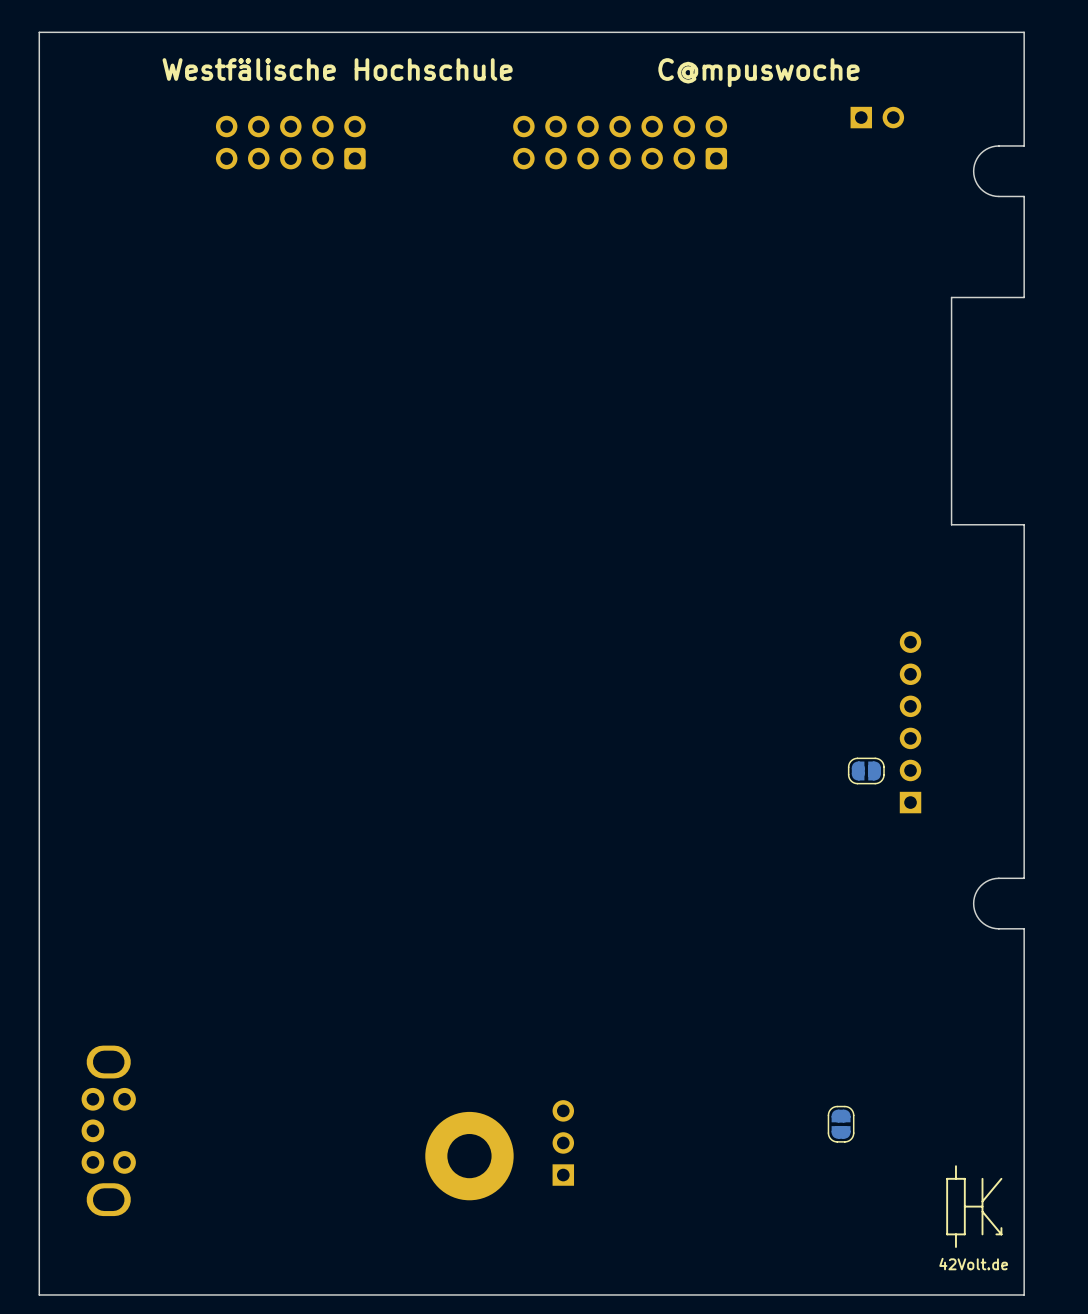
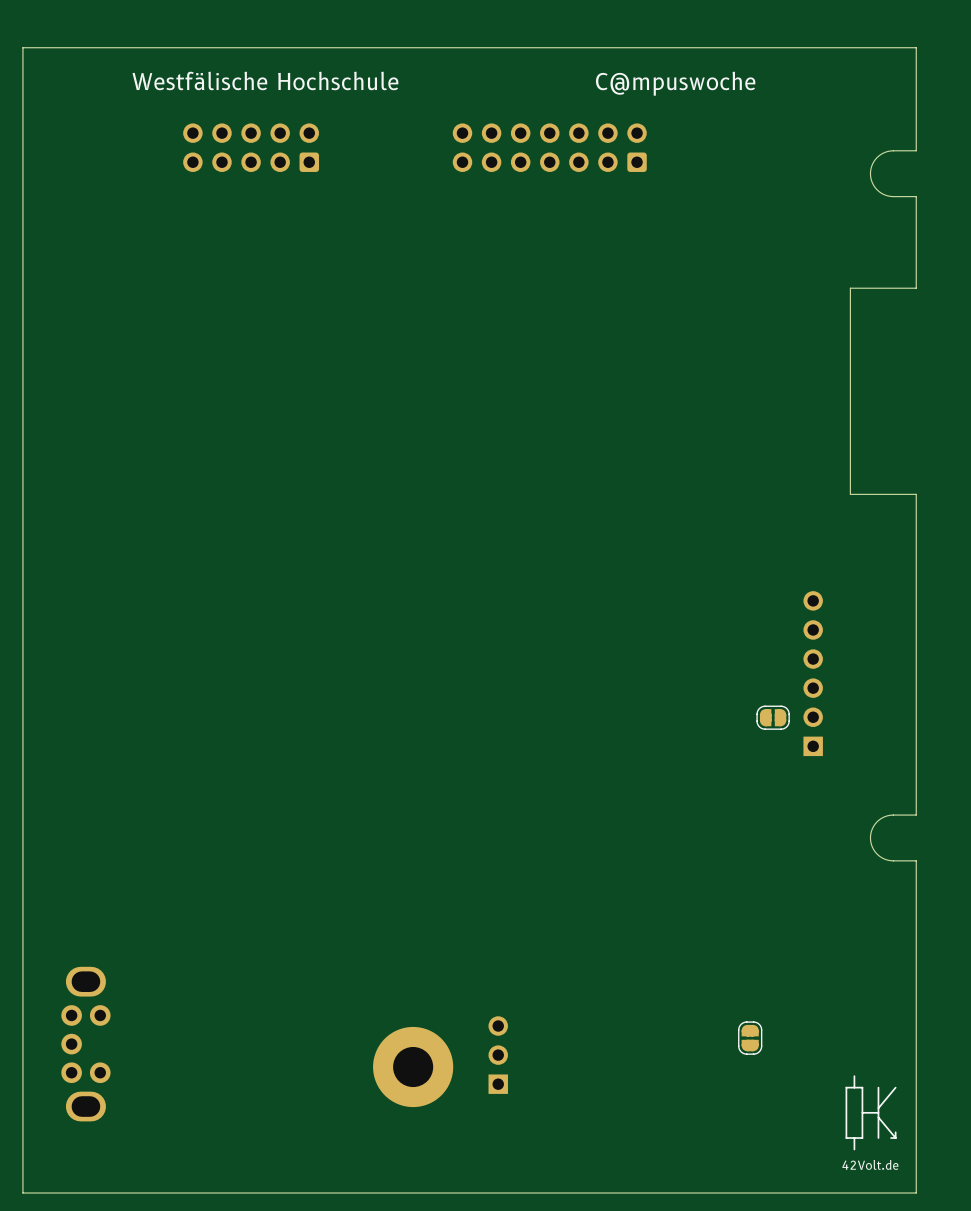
part: (877, 117) -> none

